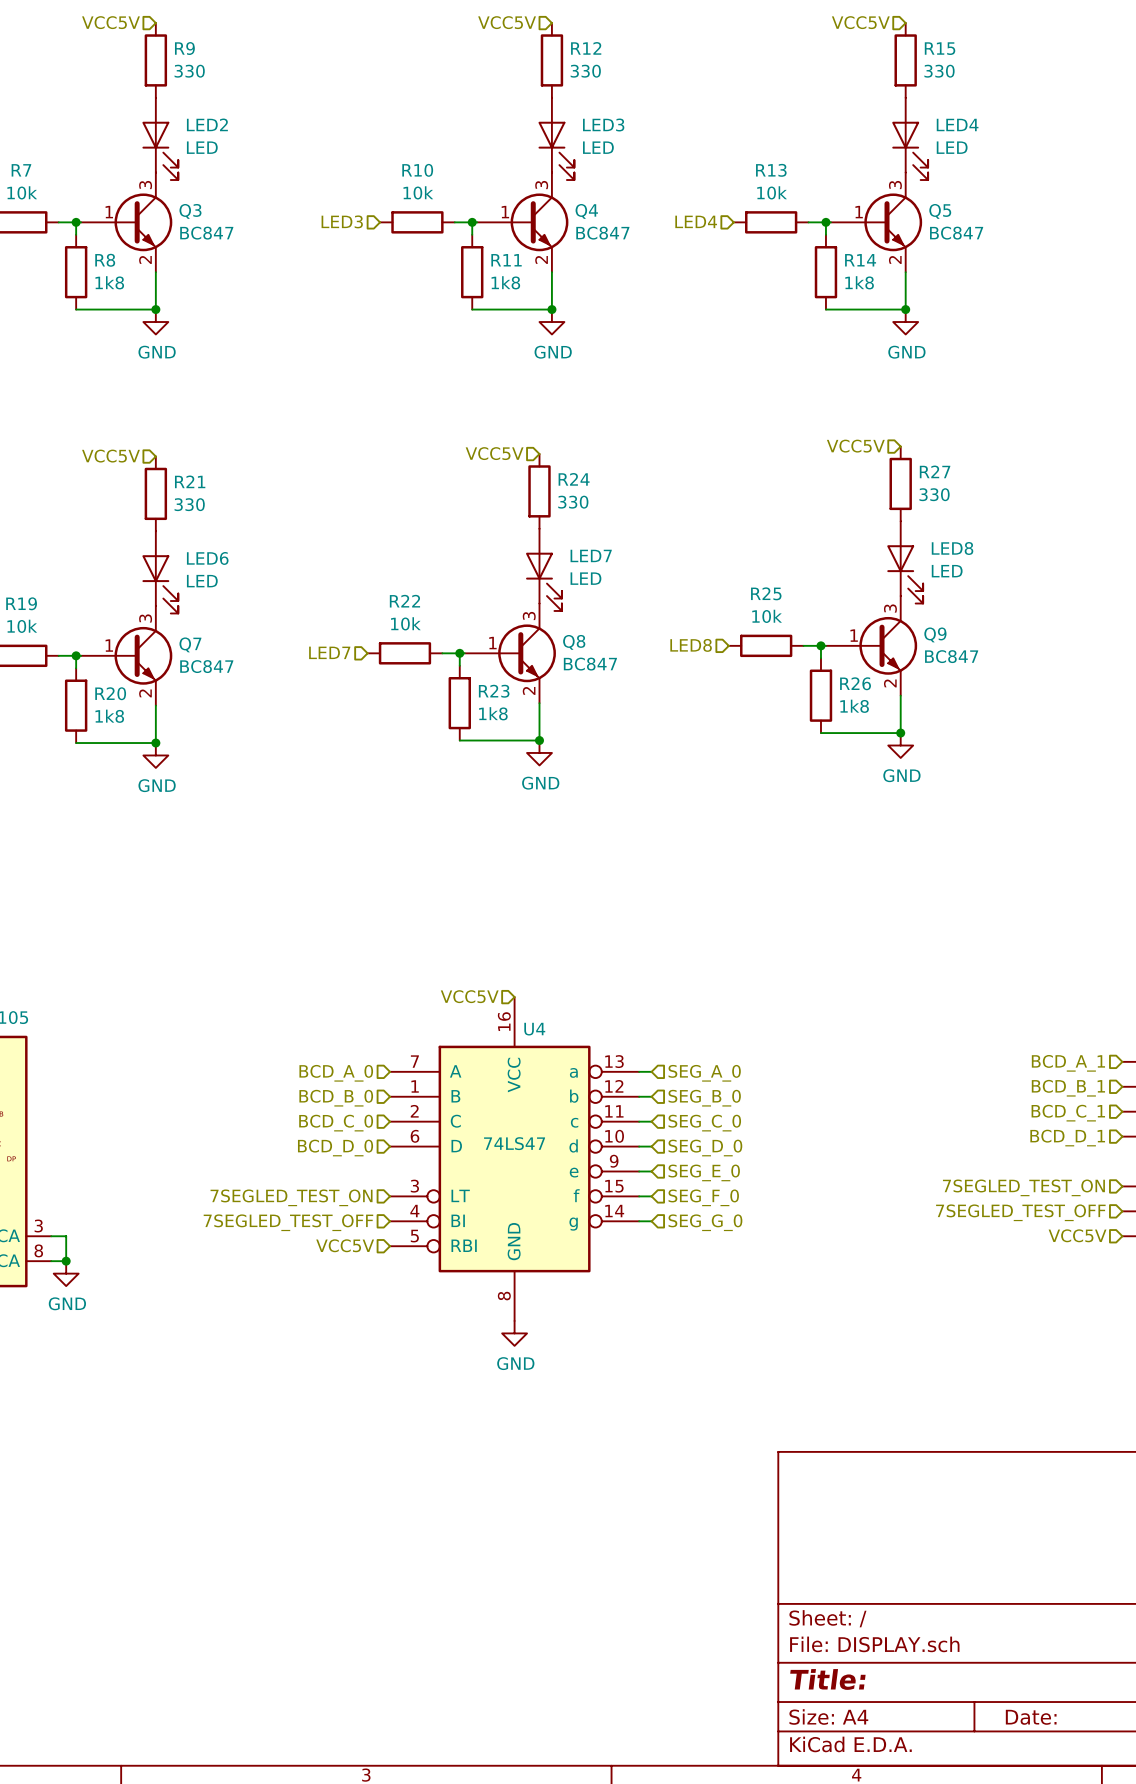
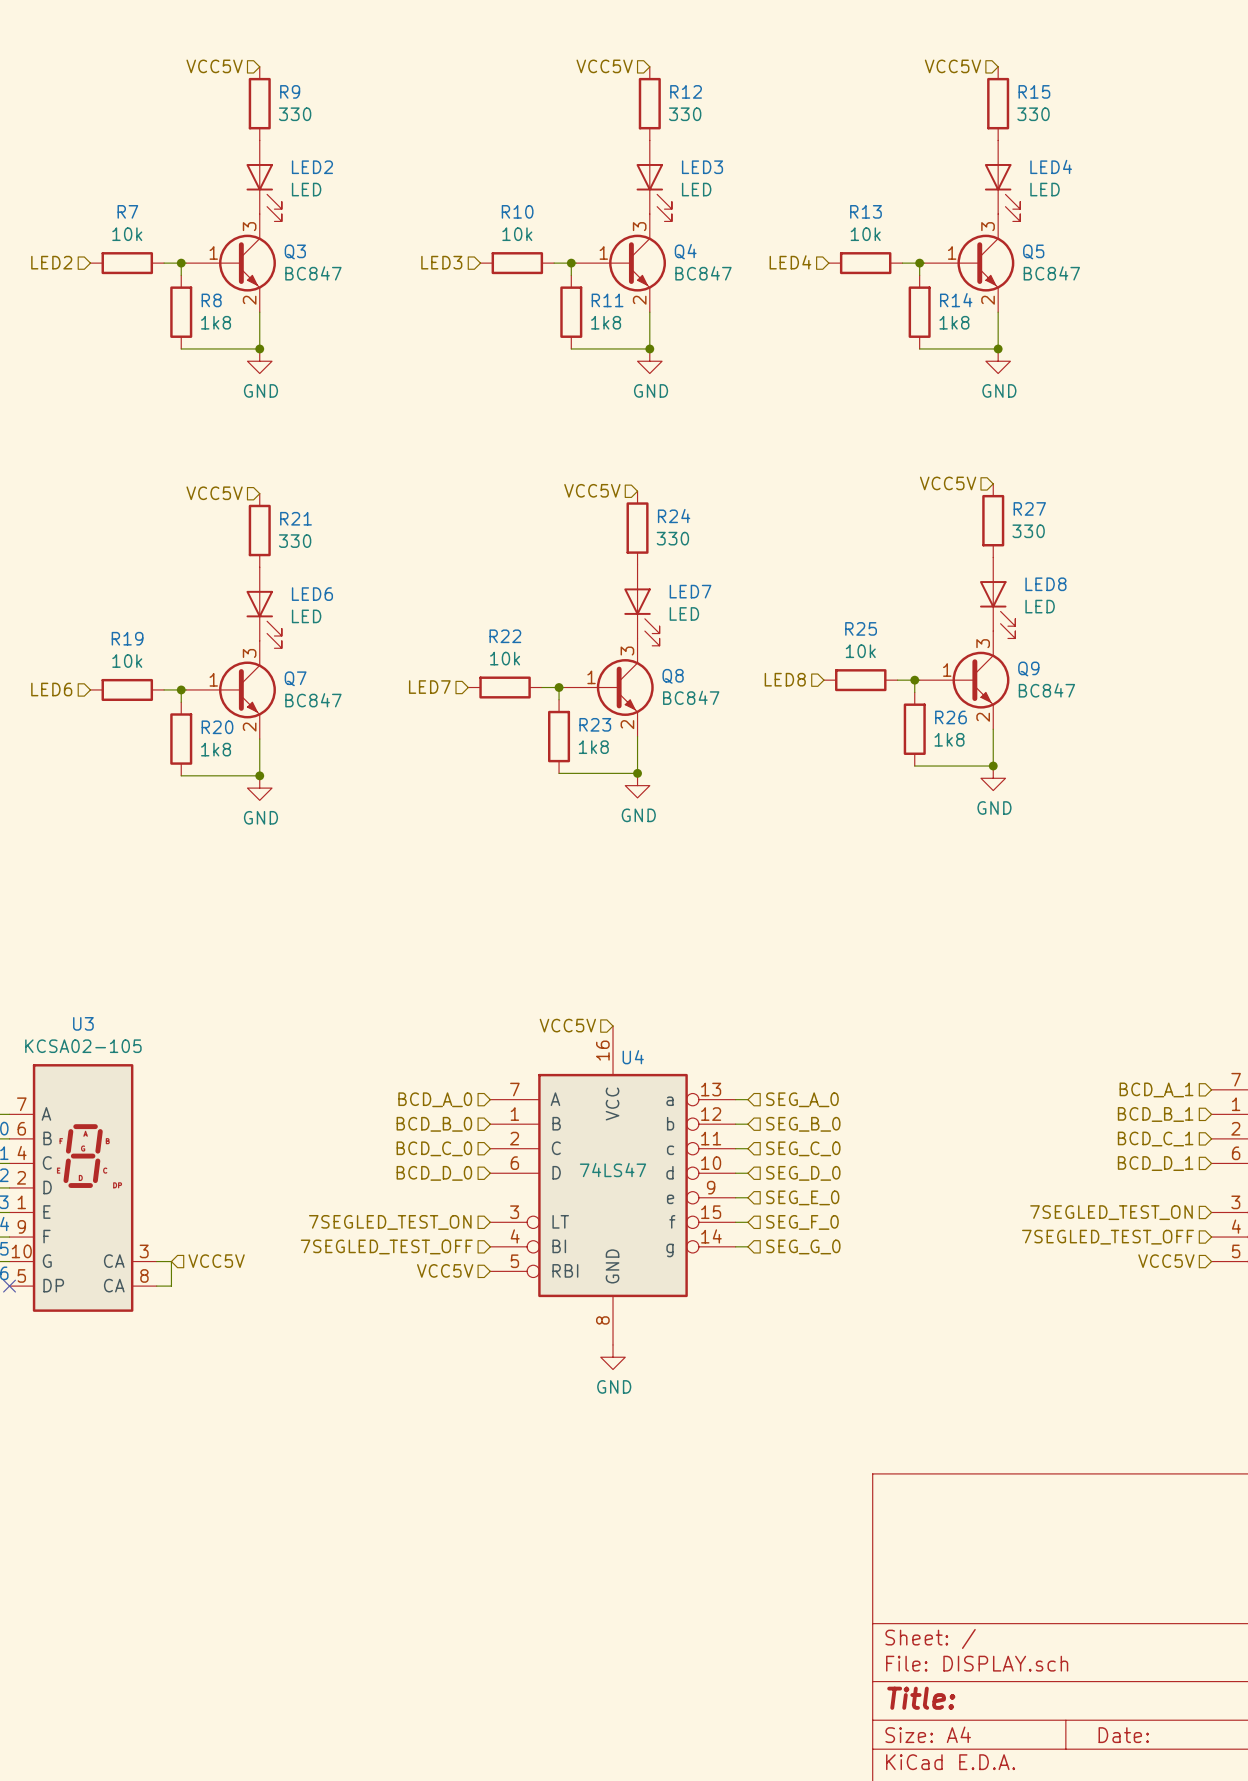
hierarchical label: none -> VCC5V (216, 1261)
junction: (66, 1261) -> none
power symbol: GND (66, 1273) -> none

